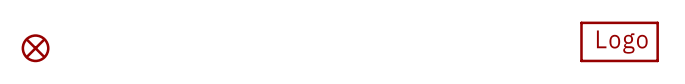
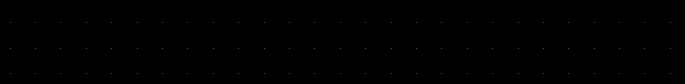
part: (619, 41) -> none
part: (35, 48) -> none

